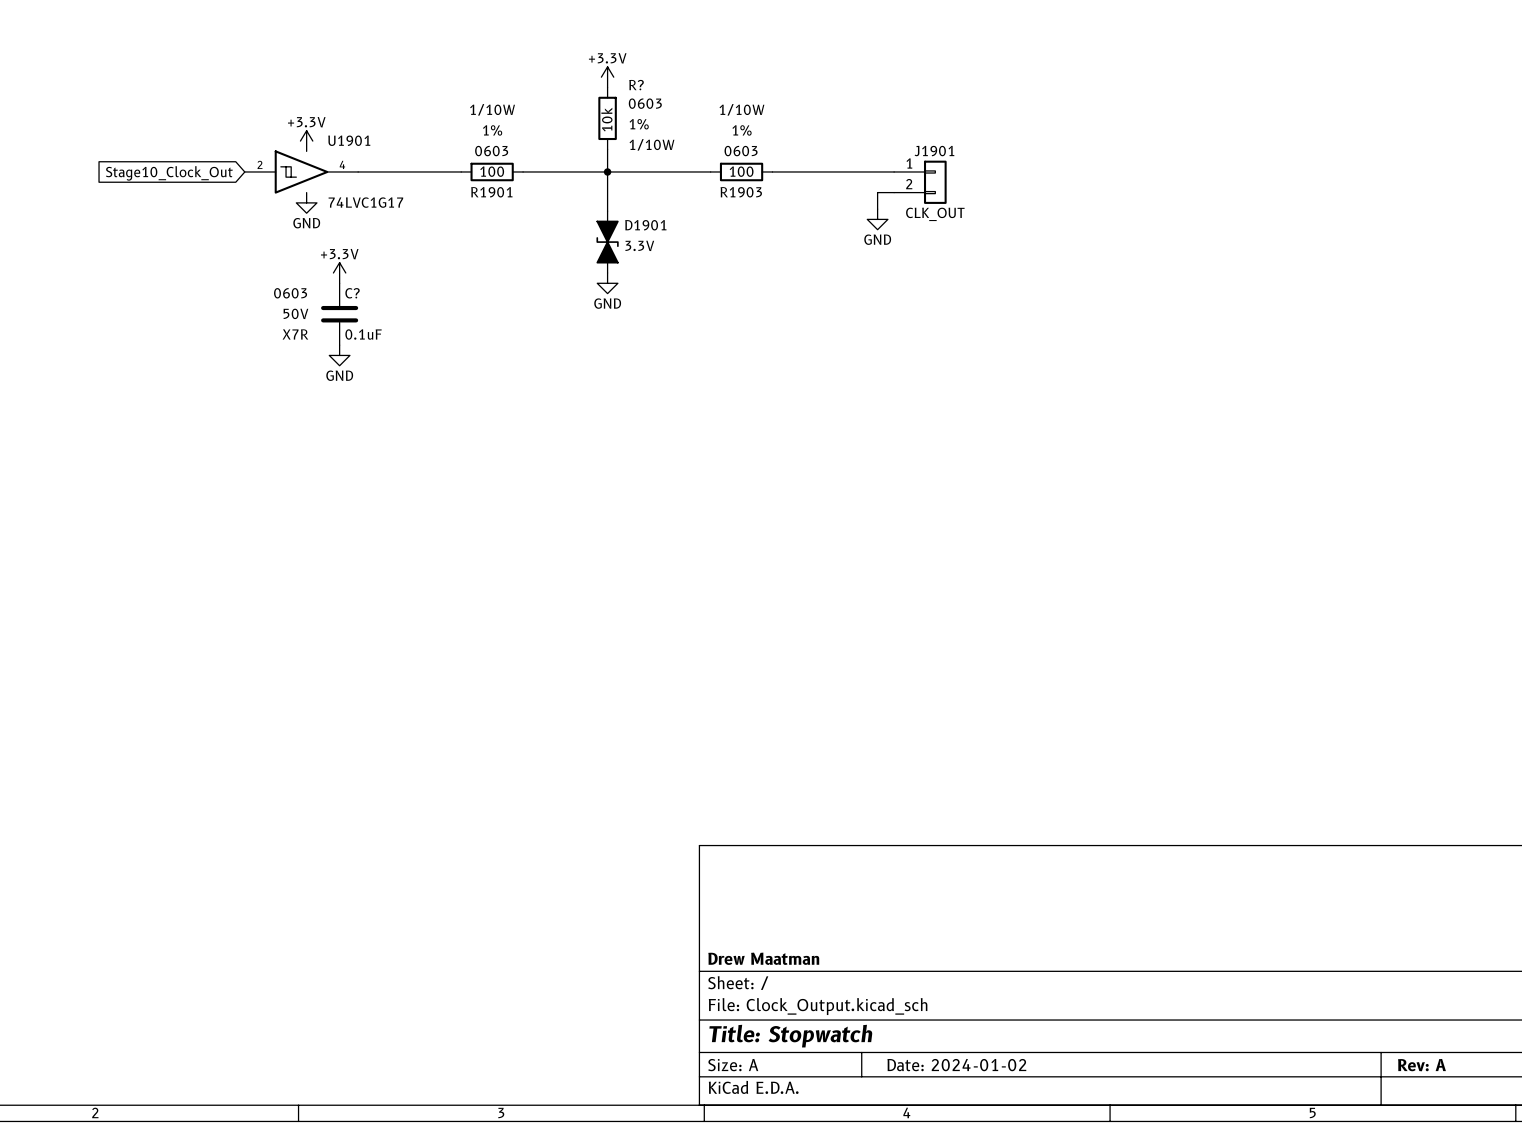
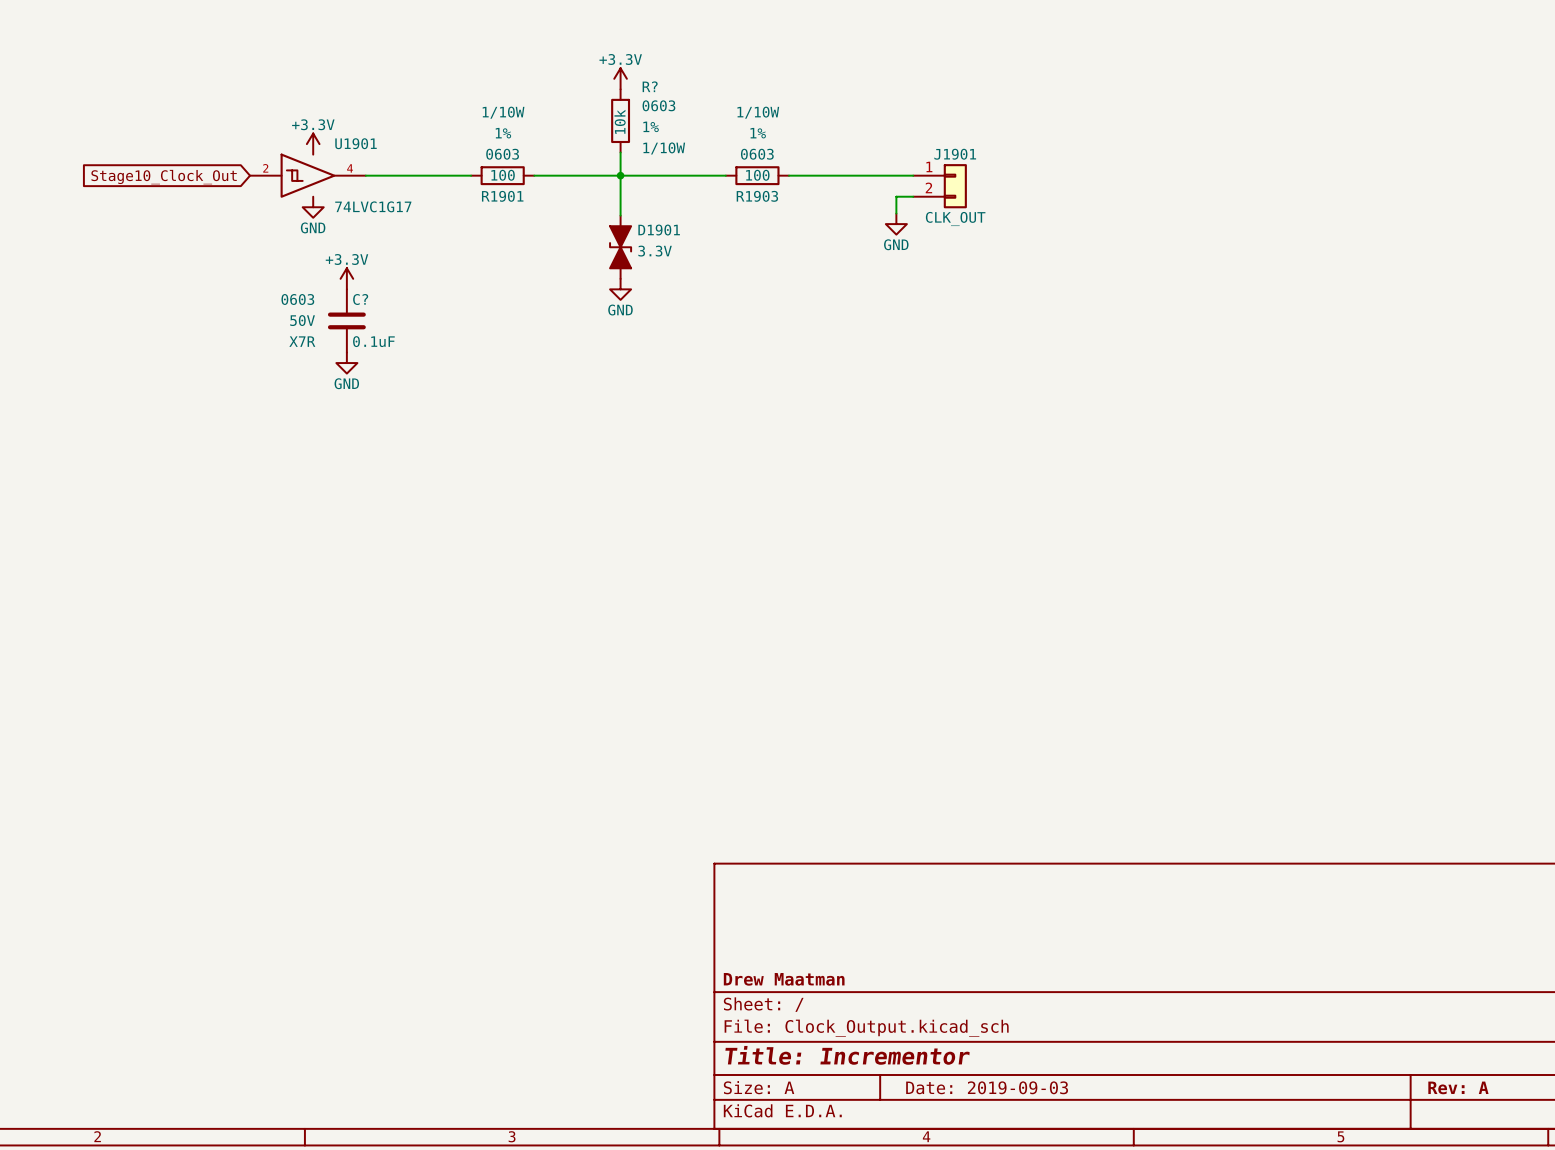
title block: Title: Stopwatch (790, 1036) -> Title: Incrementor (847, 1055)
title block: Date: 2024-01-02 (956, 1065) -> Date: 2019-09-03 (987, 1087)

